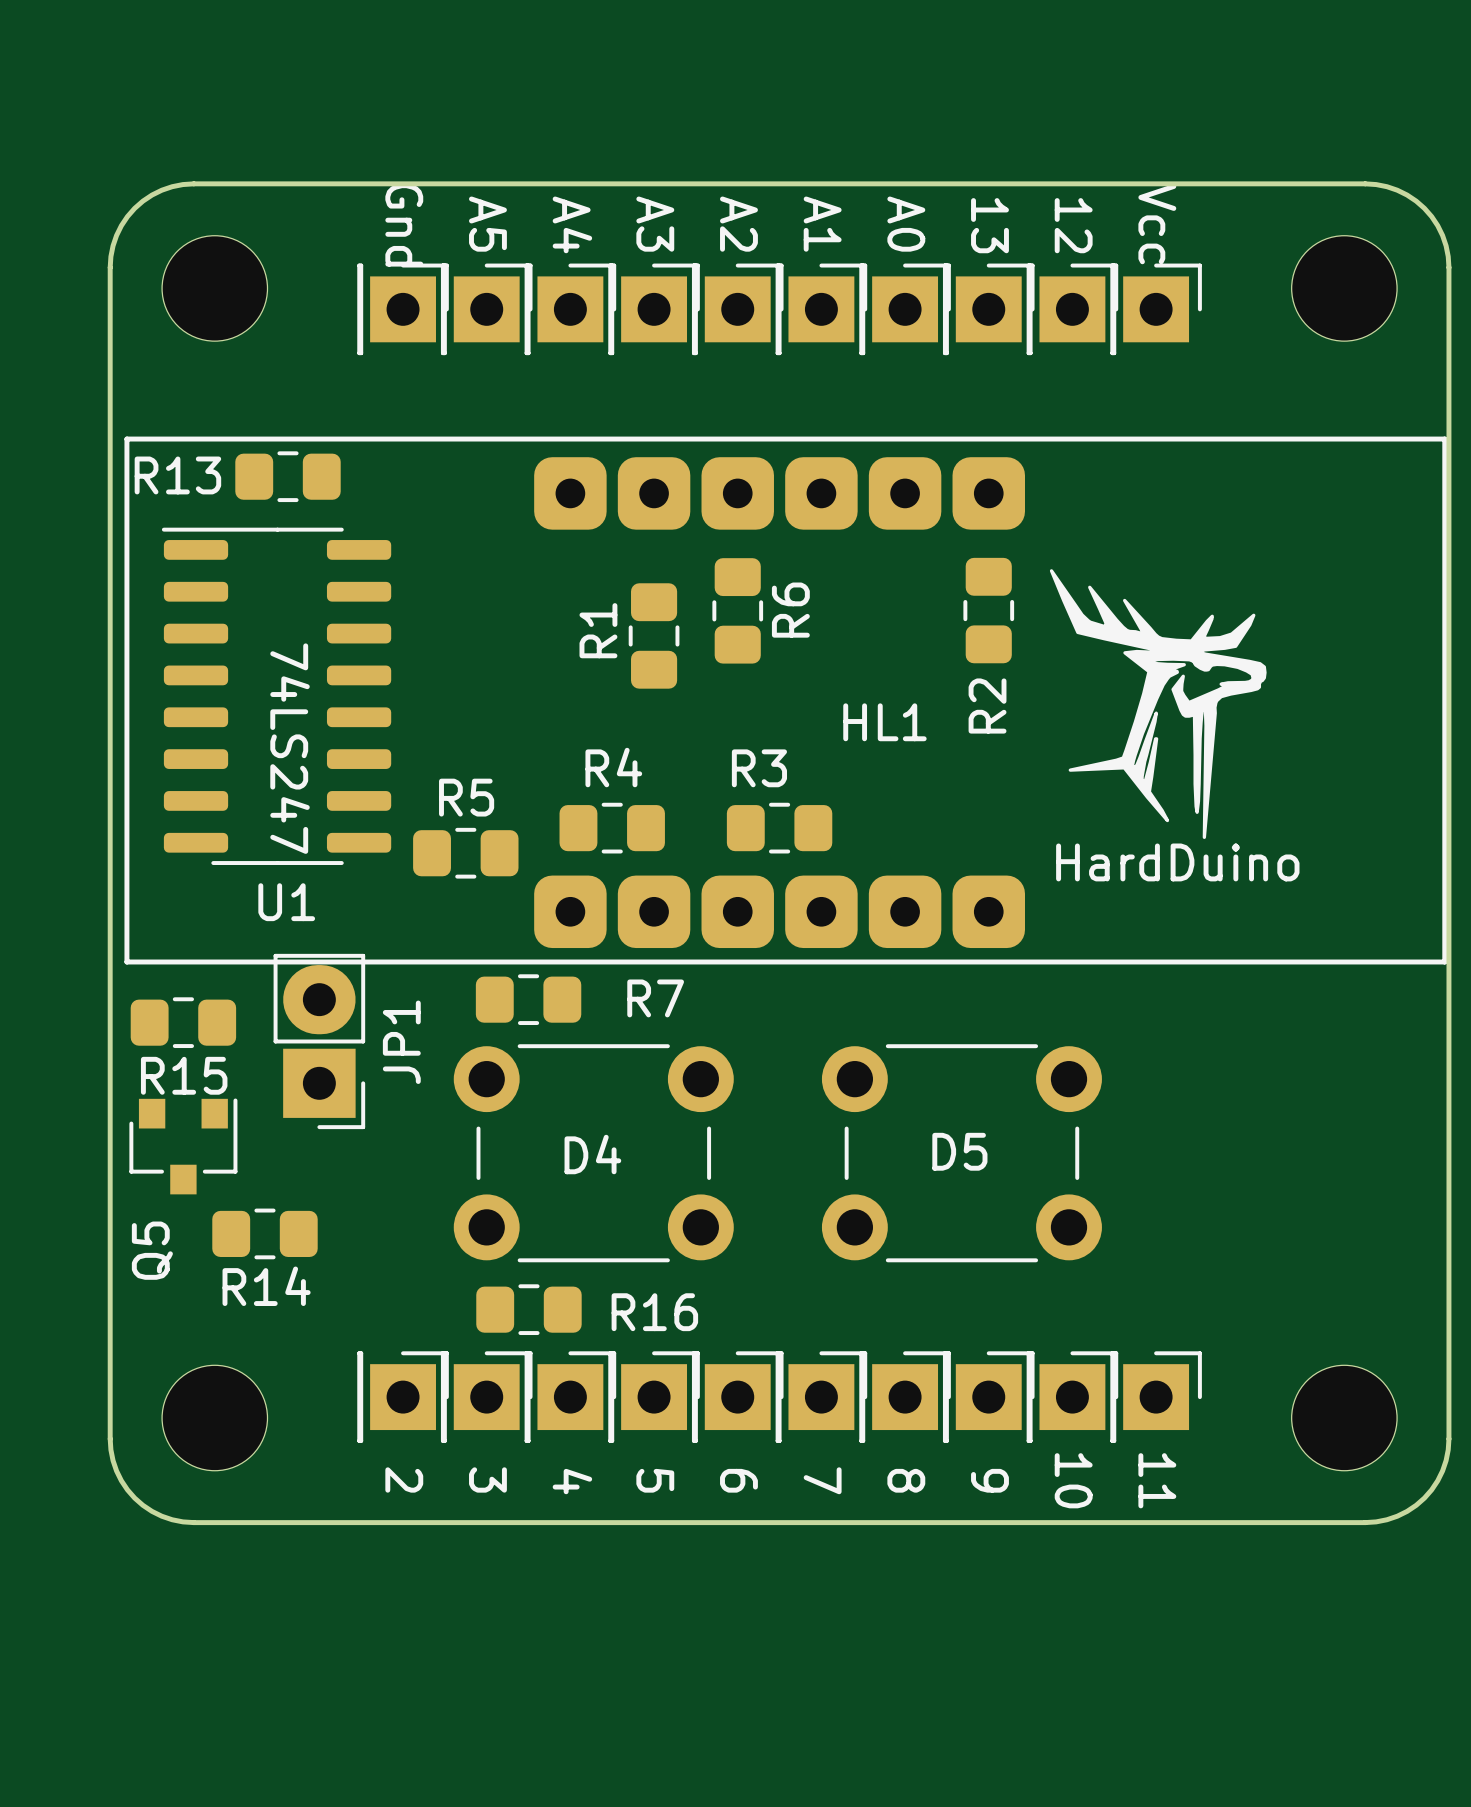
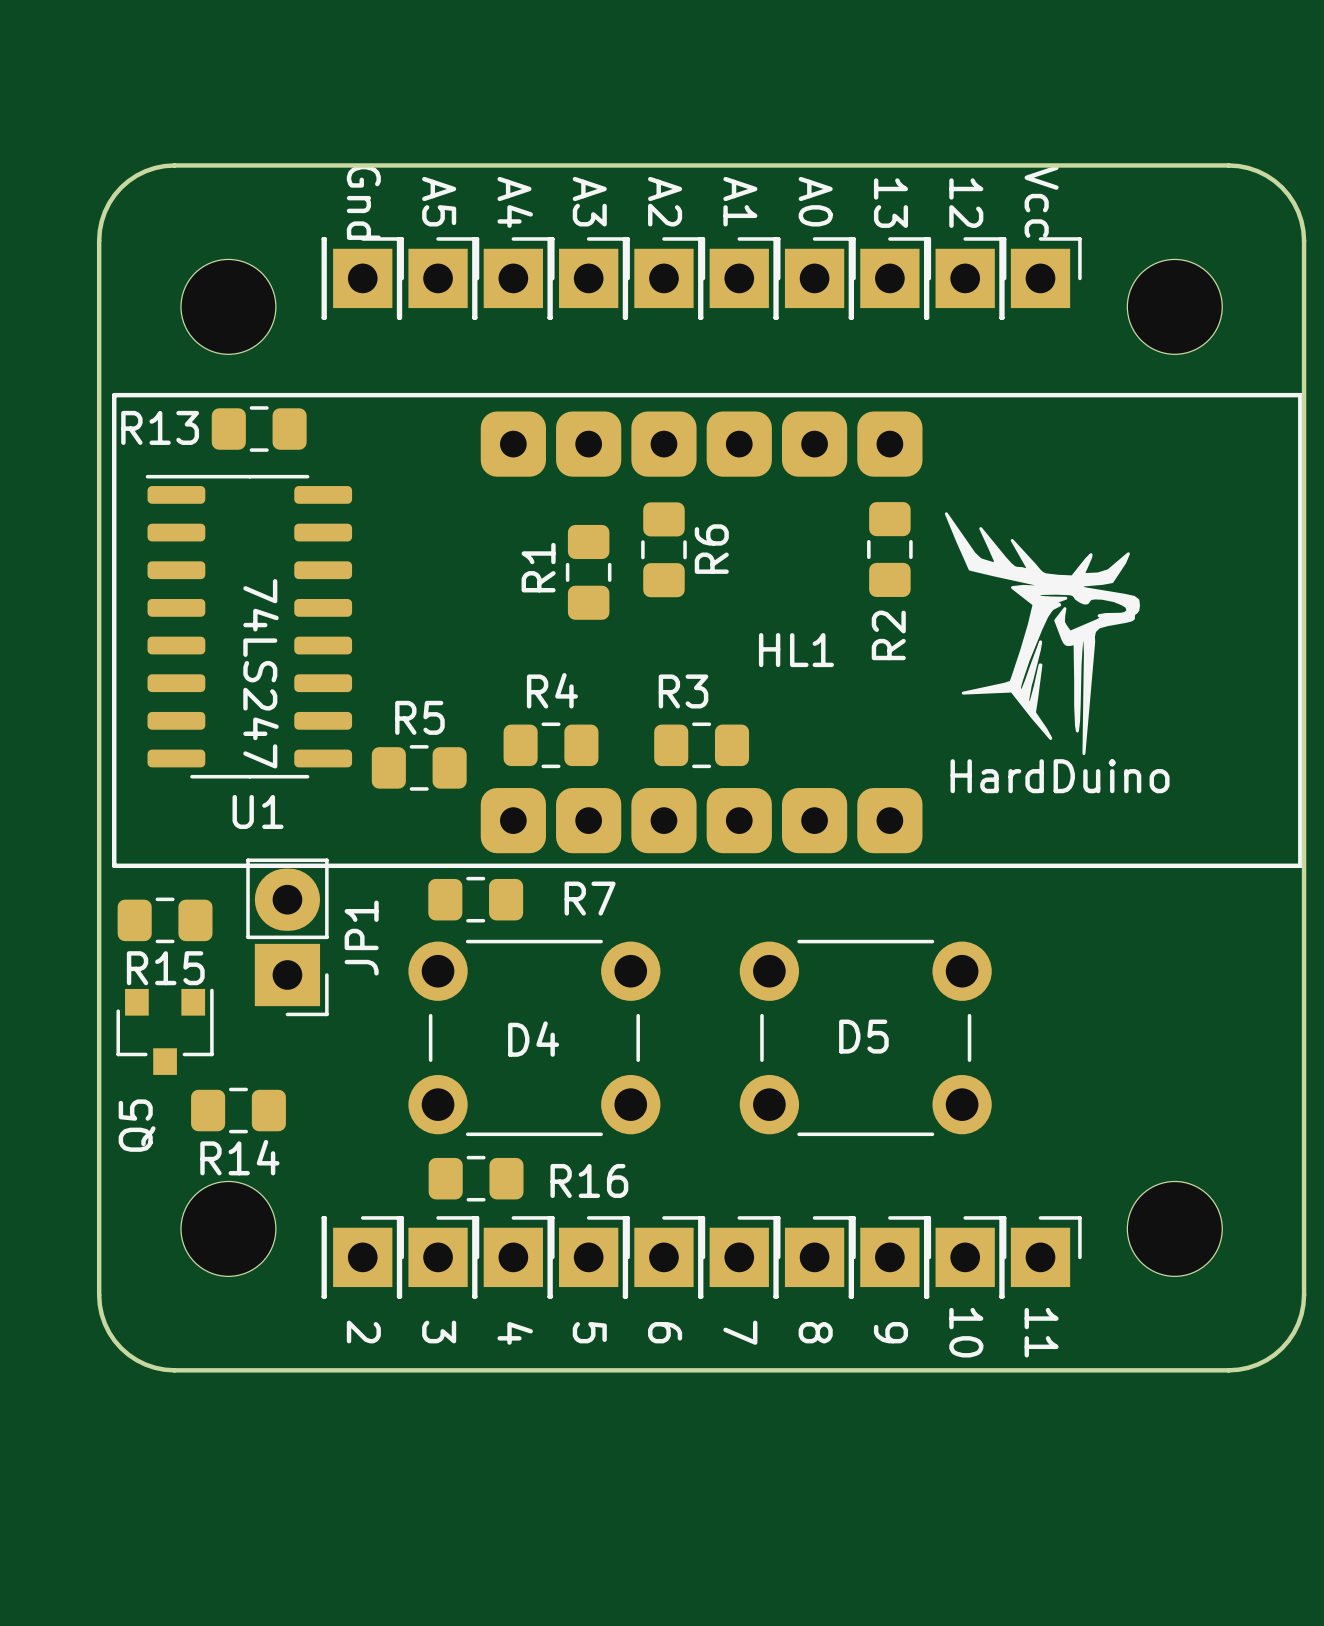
part position: (214, 288) -> (228, 306)
part position: (1344, 288) -> (1174, 306)
part position: (214, 1418) -> (228, 1228)
part position: (1344, 1418) -> (1174, 1228)

